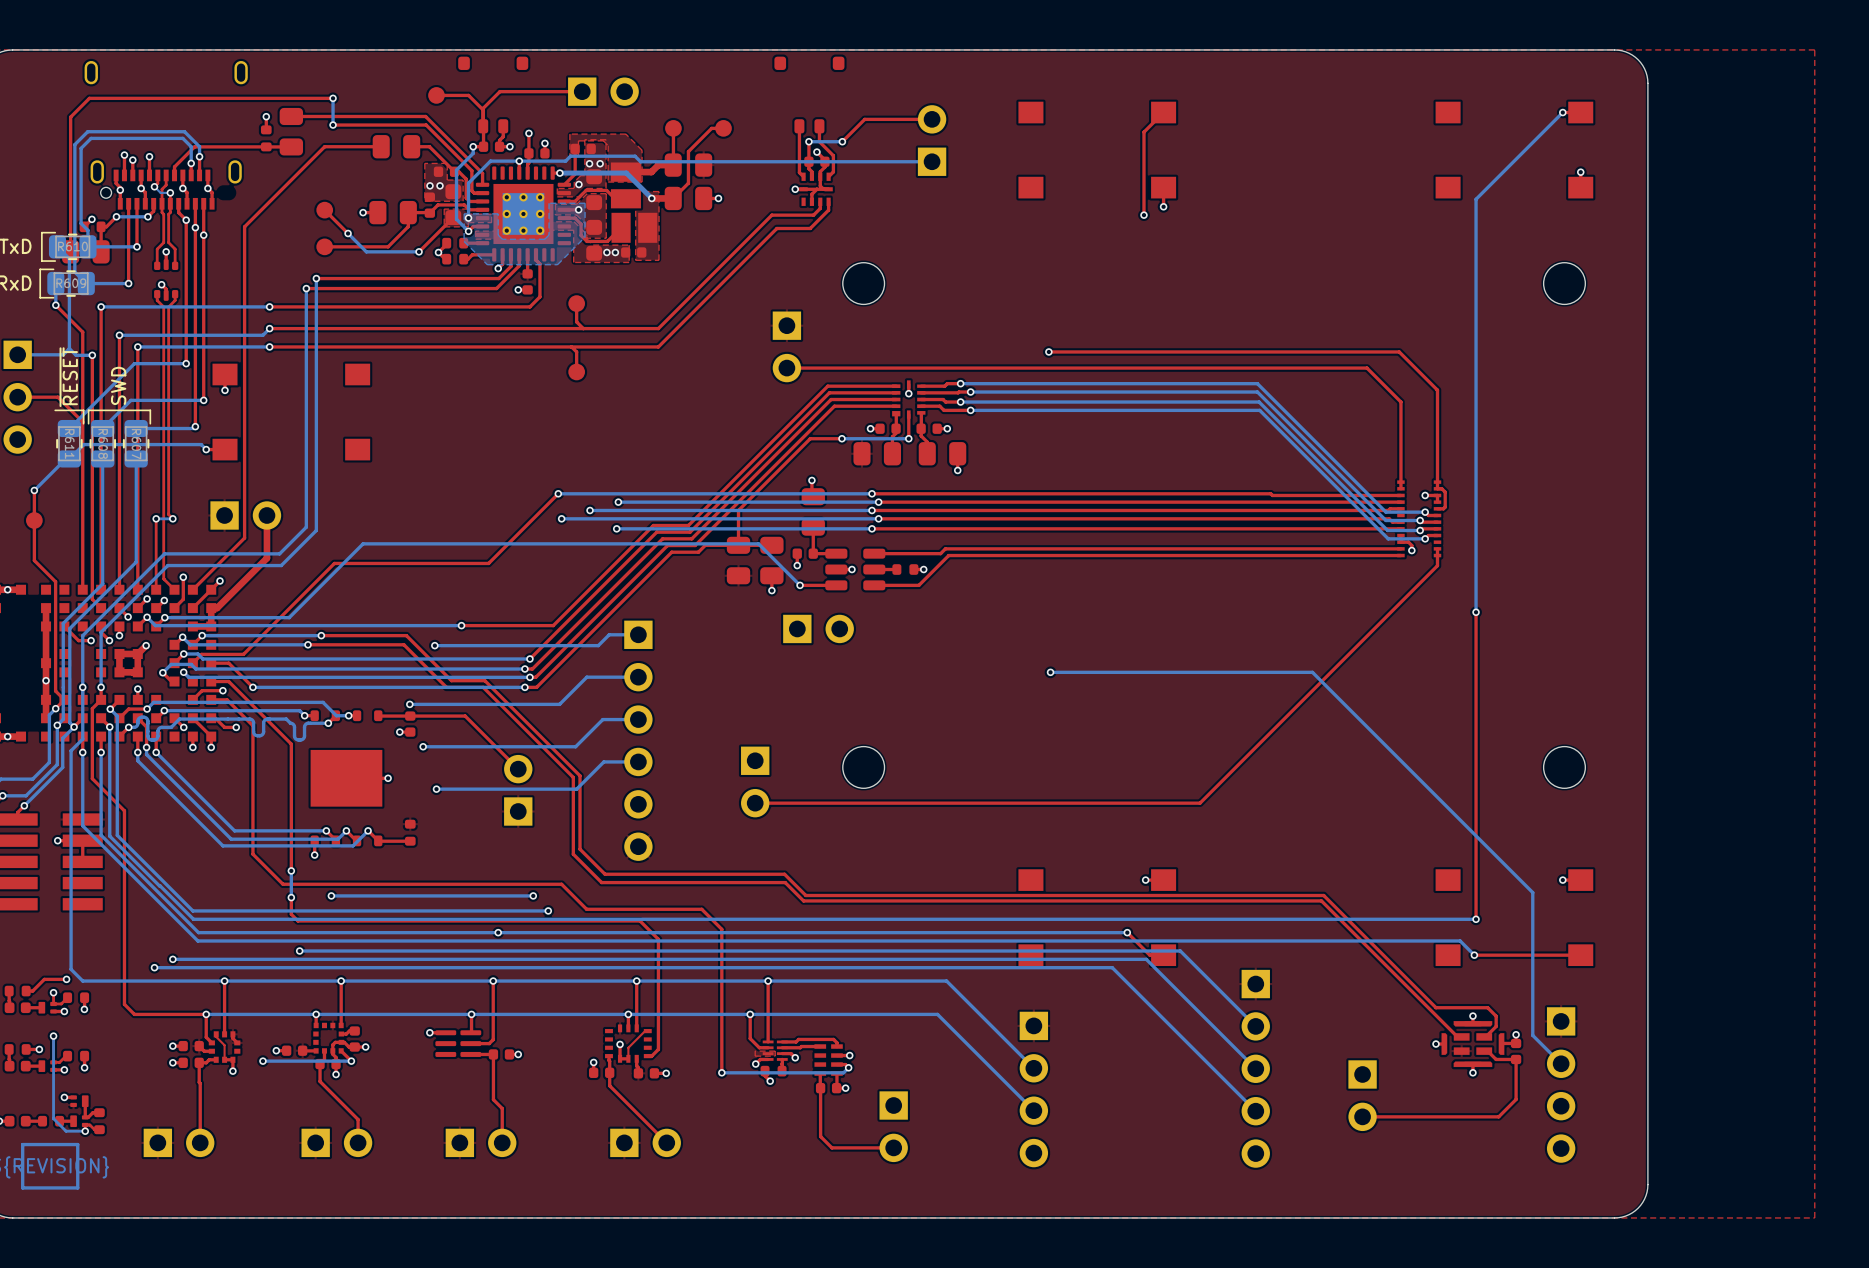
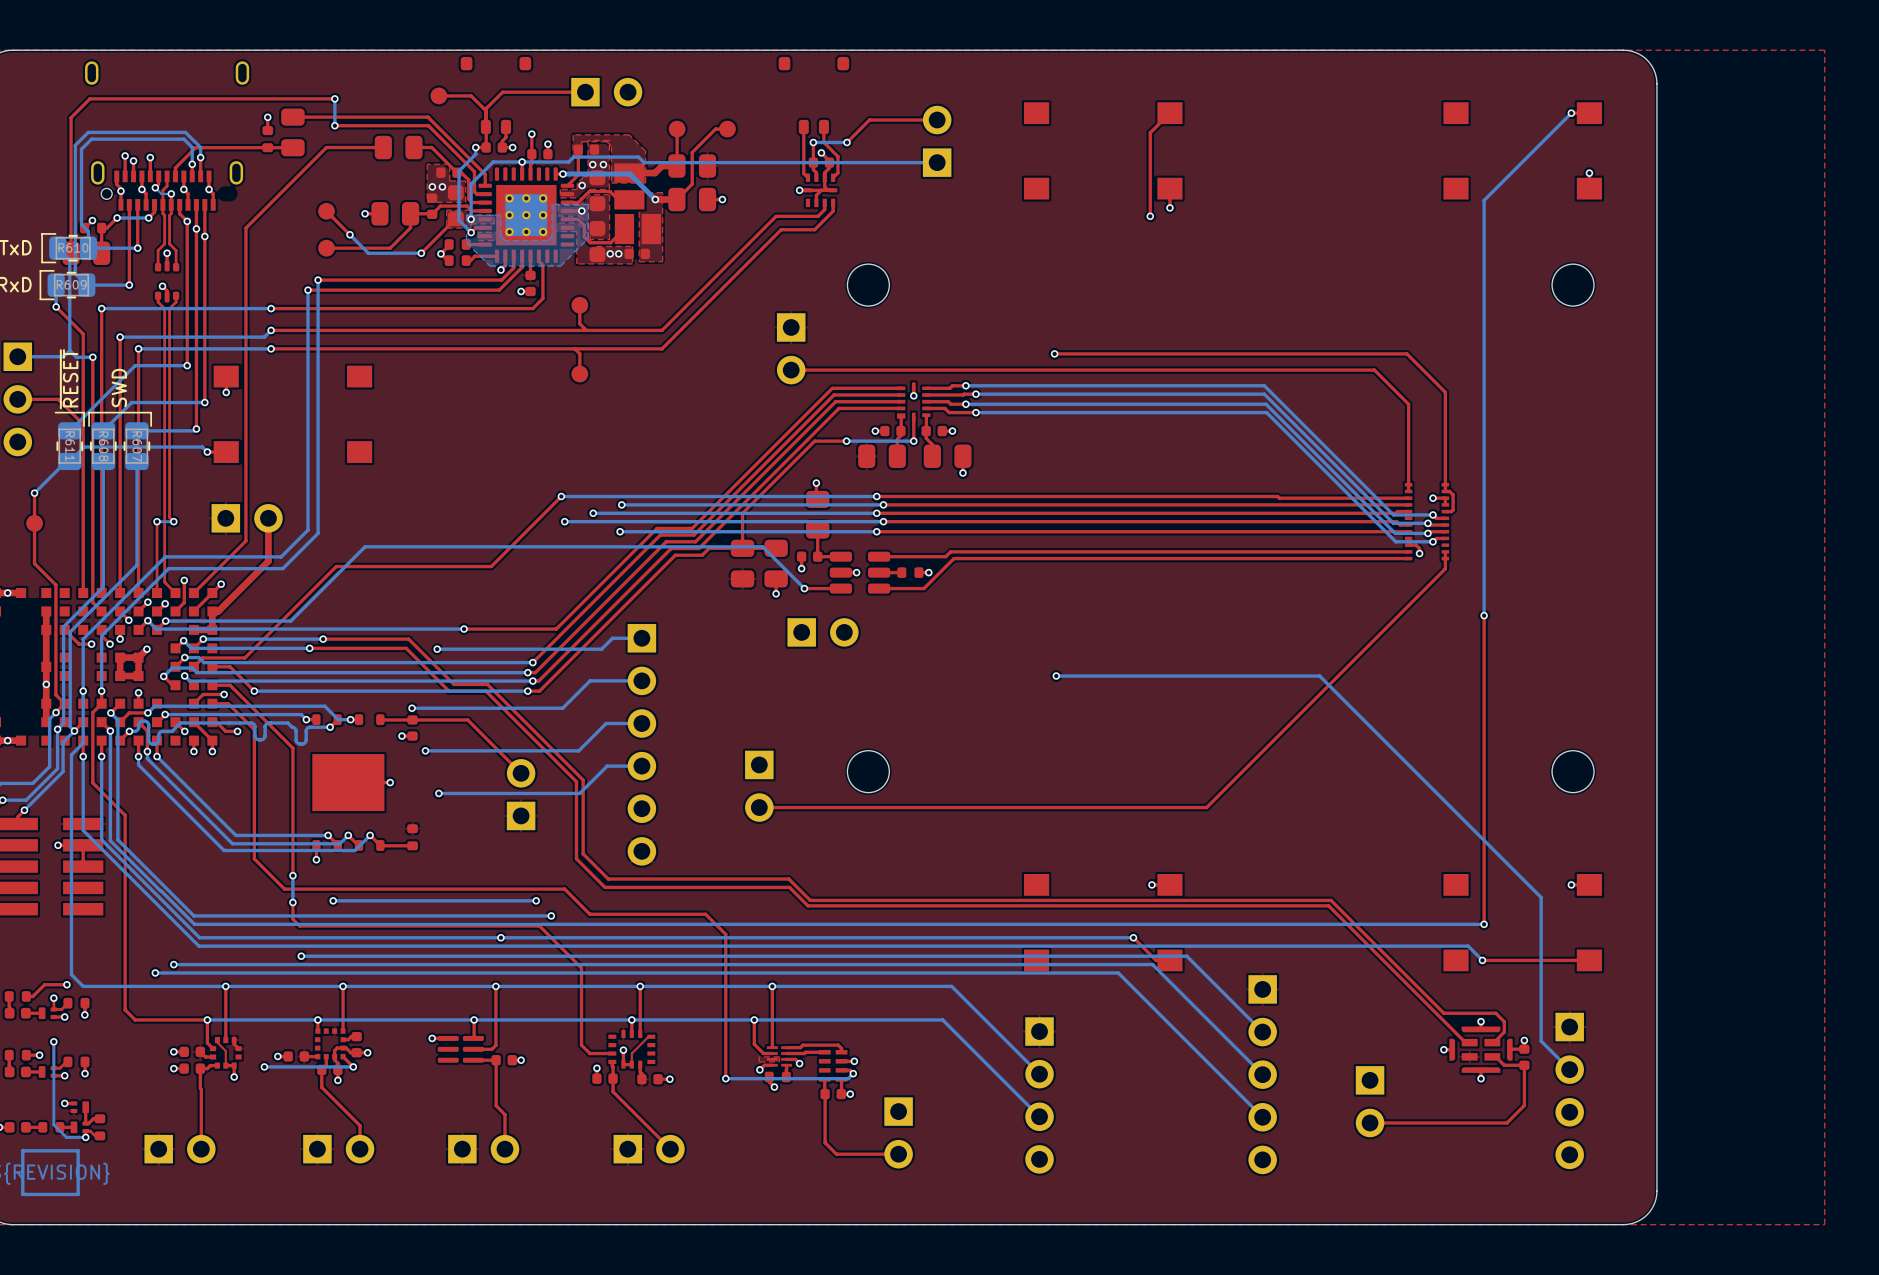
top track: (536, 920) (640, 920) (658, 939) (658, 1049) (651, 1056) (647, 1056) -> (539, 926) (581, 967) (581, 1045) (589, 1053) (612, 1053)

